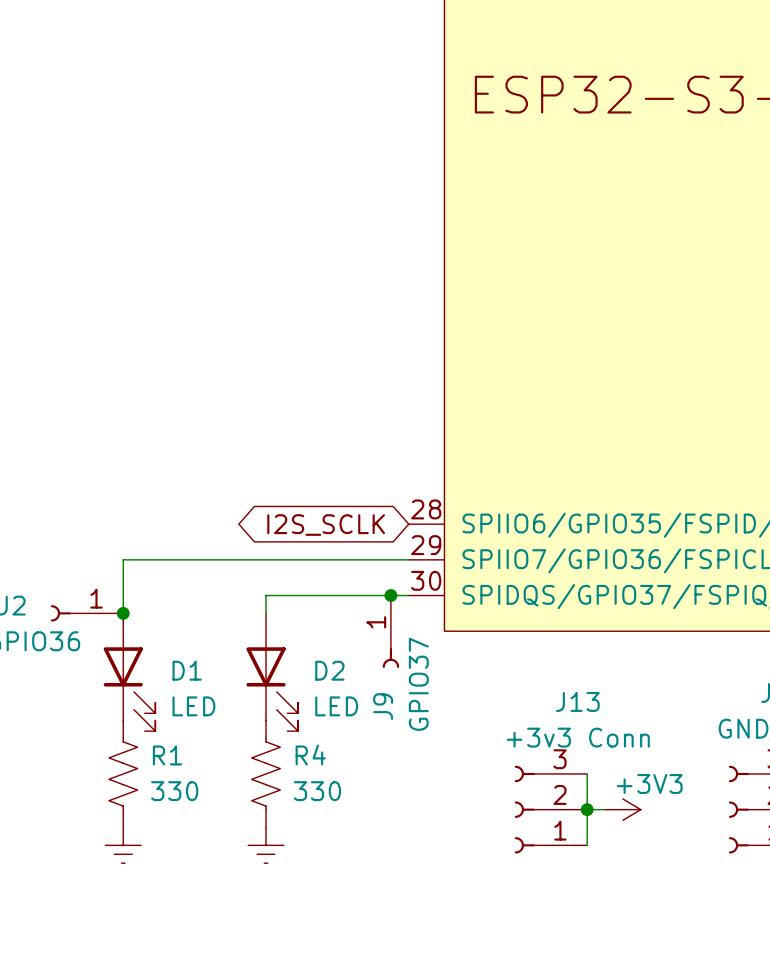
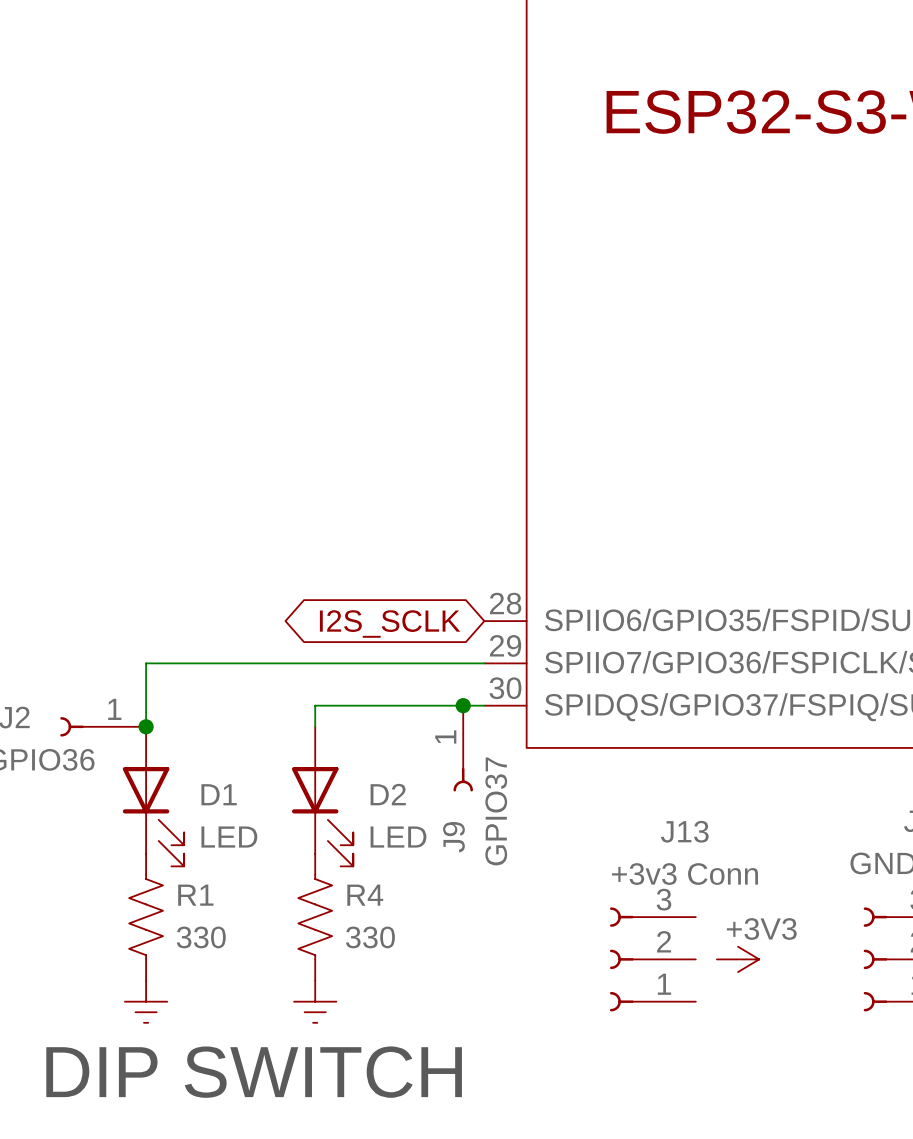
wire: (587, 773) (587, 845) -> none
wire: (587, 809) (605, 809) -> none
junction: (587, 809) -> none
text: none -> DIP SWITCH (254, 1072)

